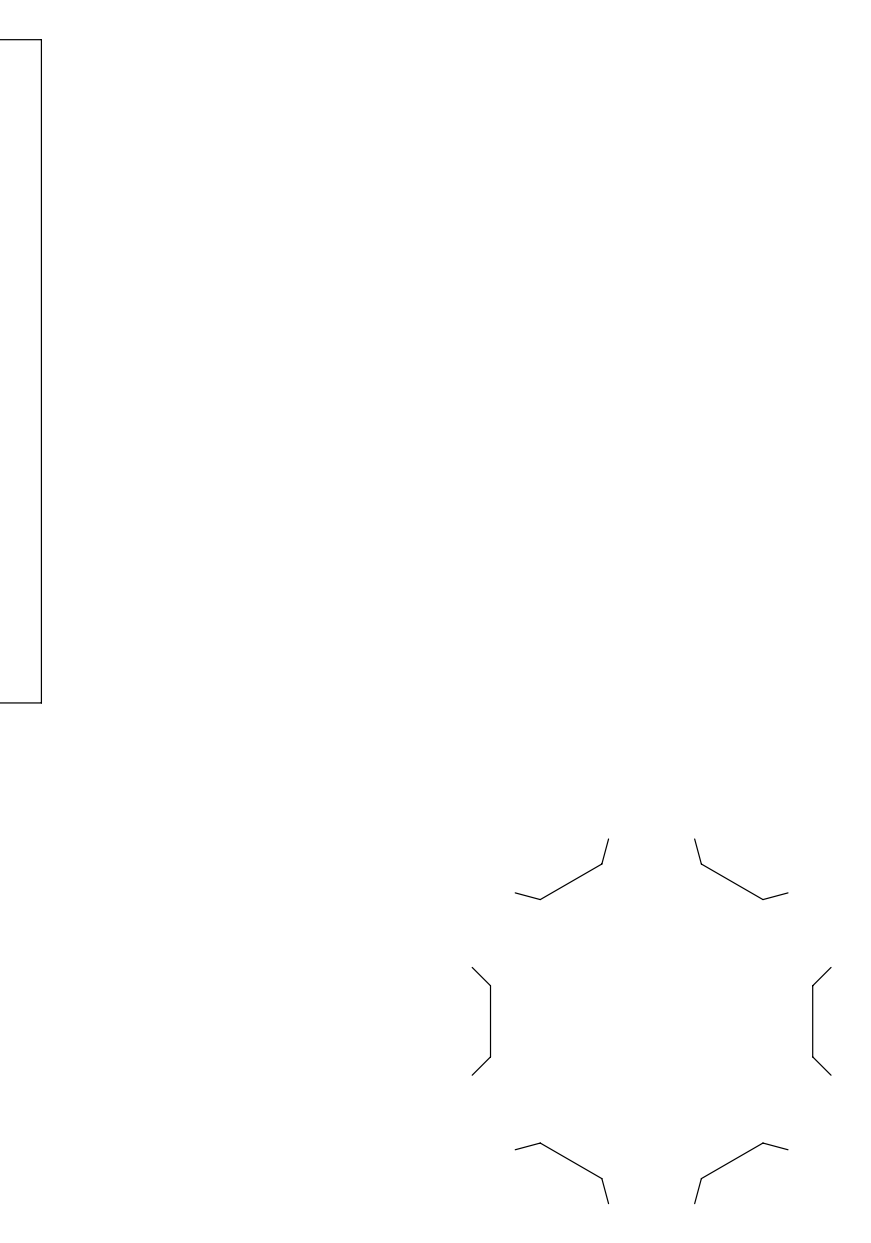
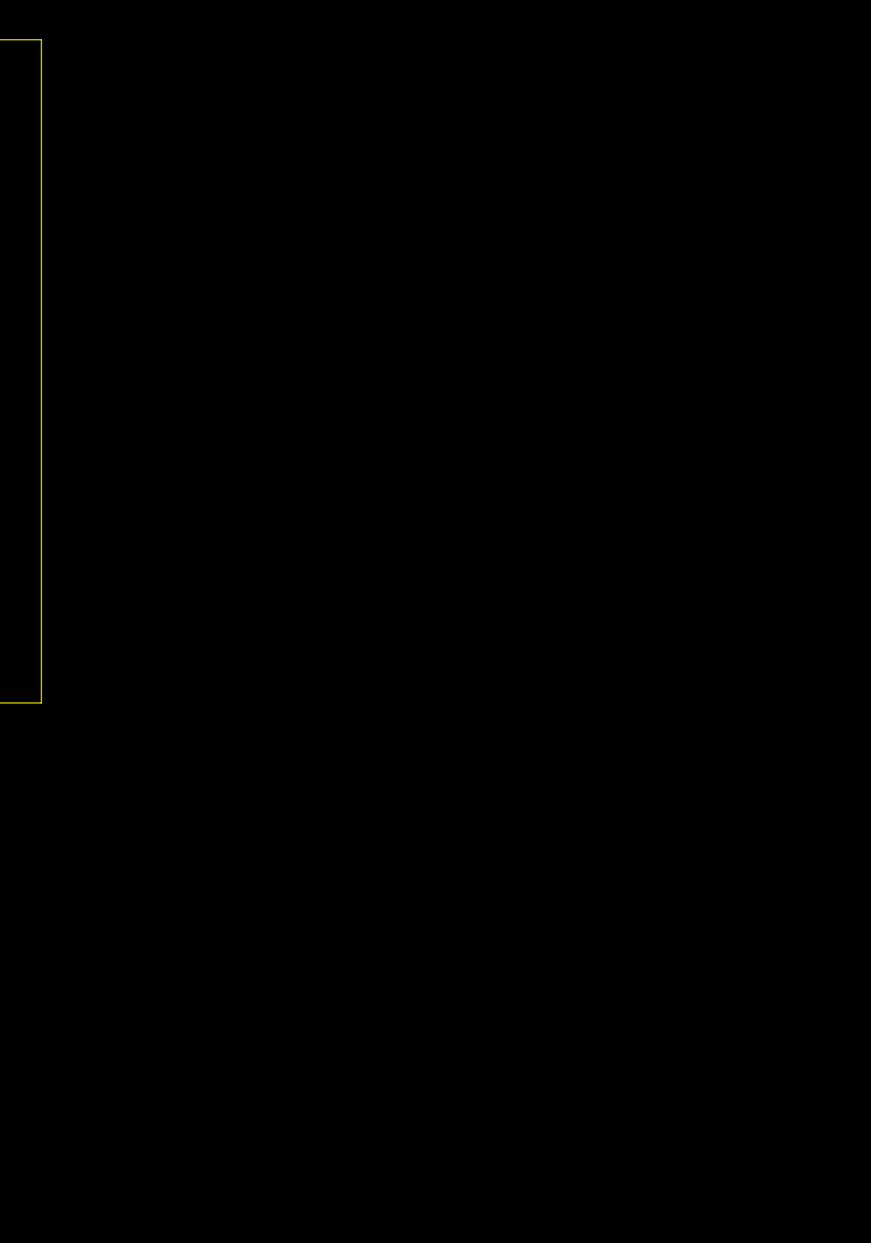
board edge: (608, 838) (601, 864) (540, 899) (515, 892) -> none
board edge: (694, 838) (701, 864) (762, 899) (787, 892) -> none
board edge: (472, 967) (490, 985) (490, 1056) (472, 1075) -> none
board edge: (831, 967) (812, 985) (812, 1056) (831, 1075) -> none
board edge: (515, 1149) (540, 1143) (601, 1178) (608, 1203) -> none
board edge: (787, 1149) (762, 1143) (701, 1178) (694, 1203) -> none

